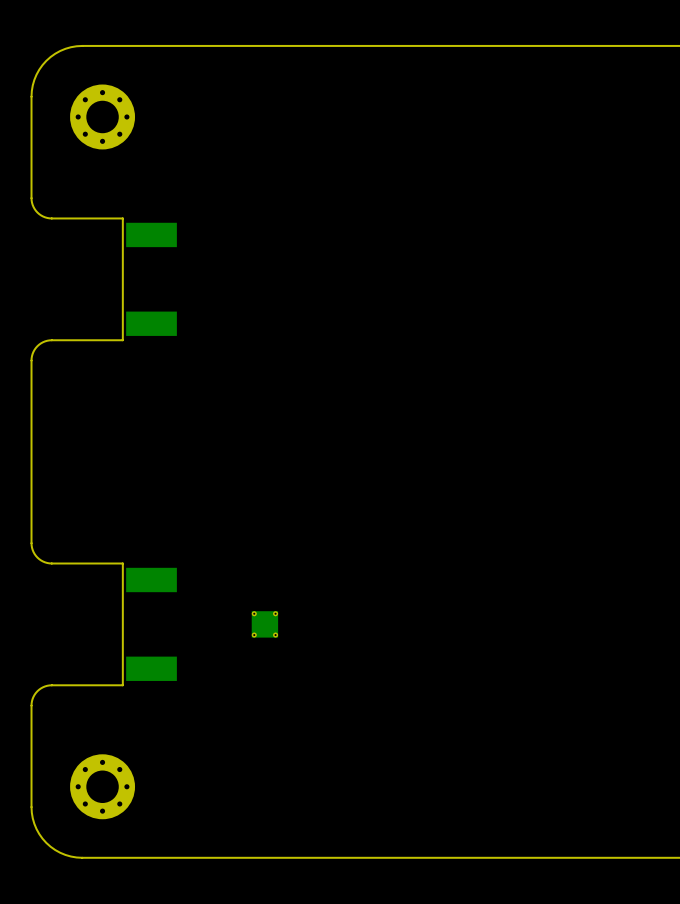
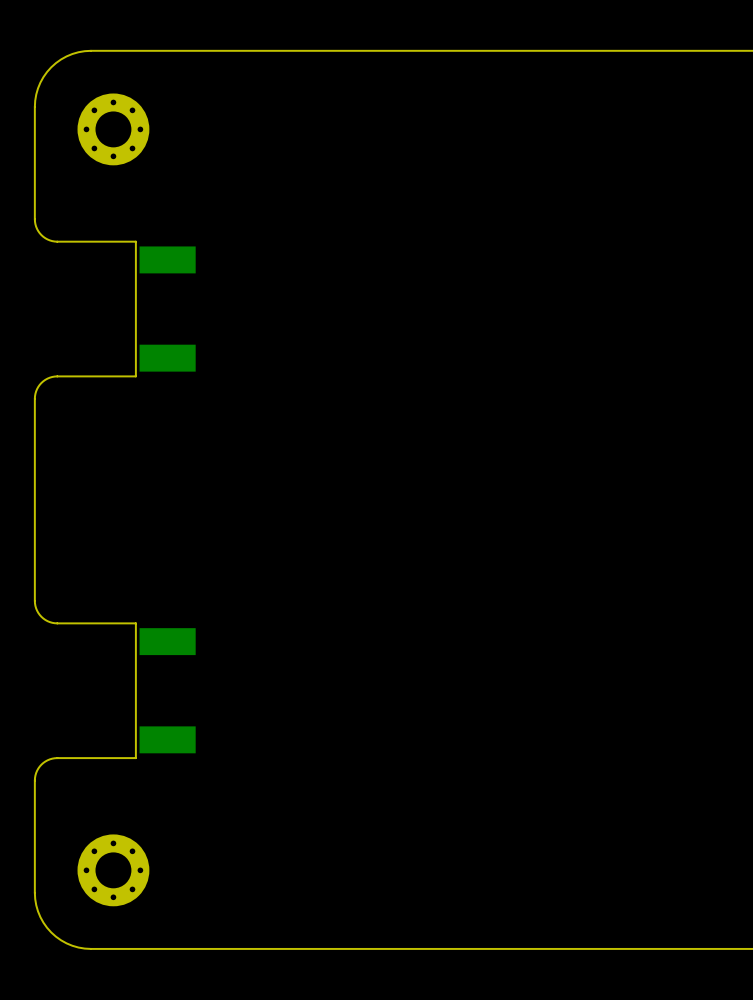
part: (264, 624) -> none

